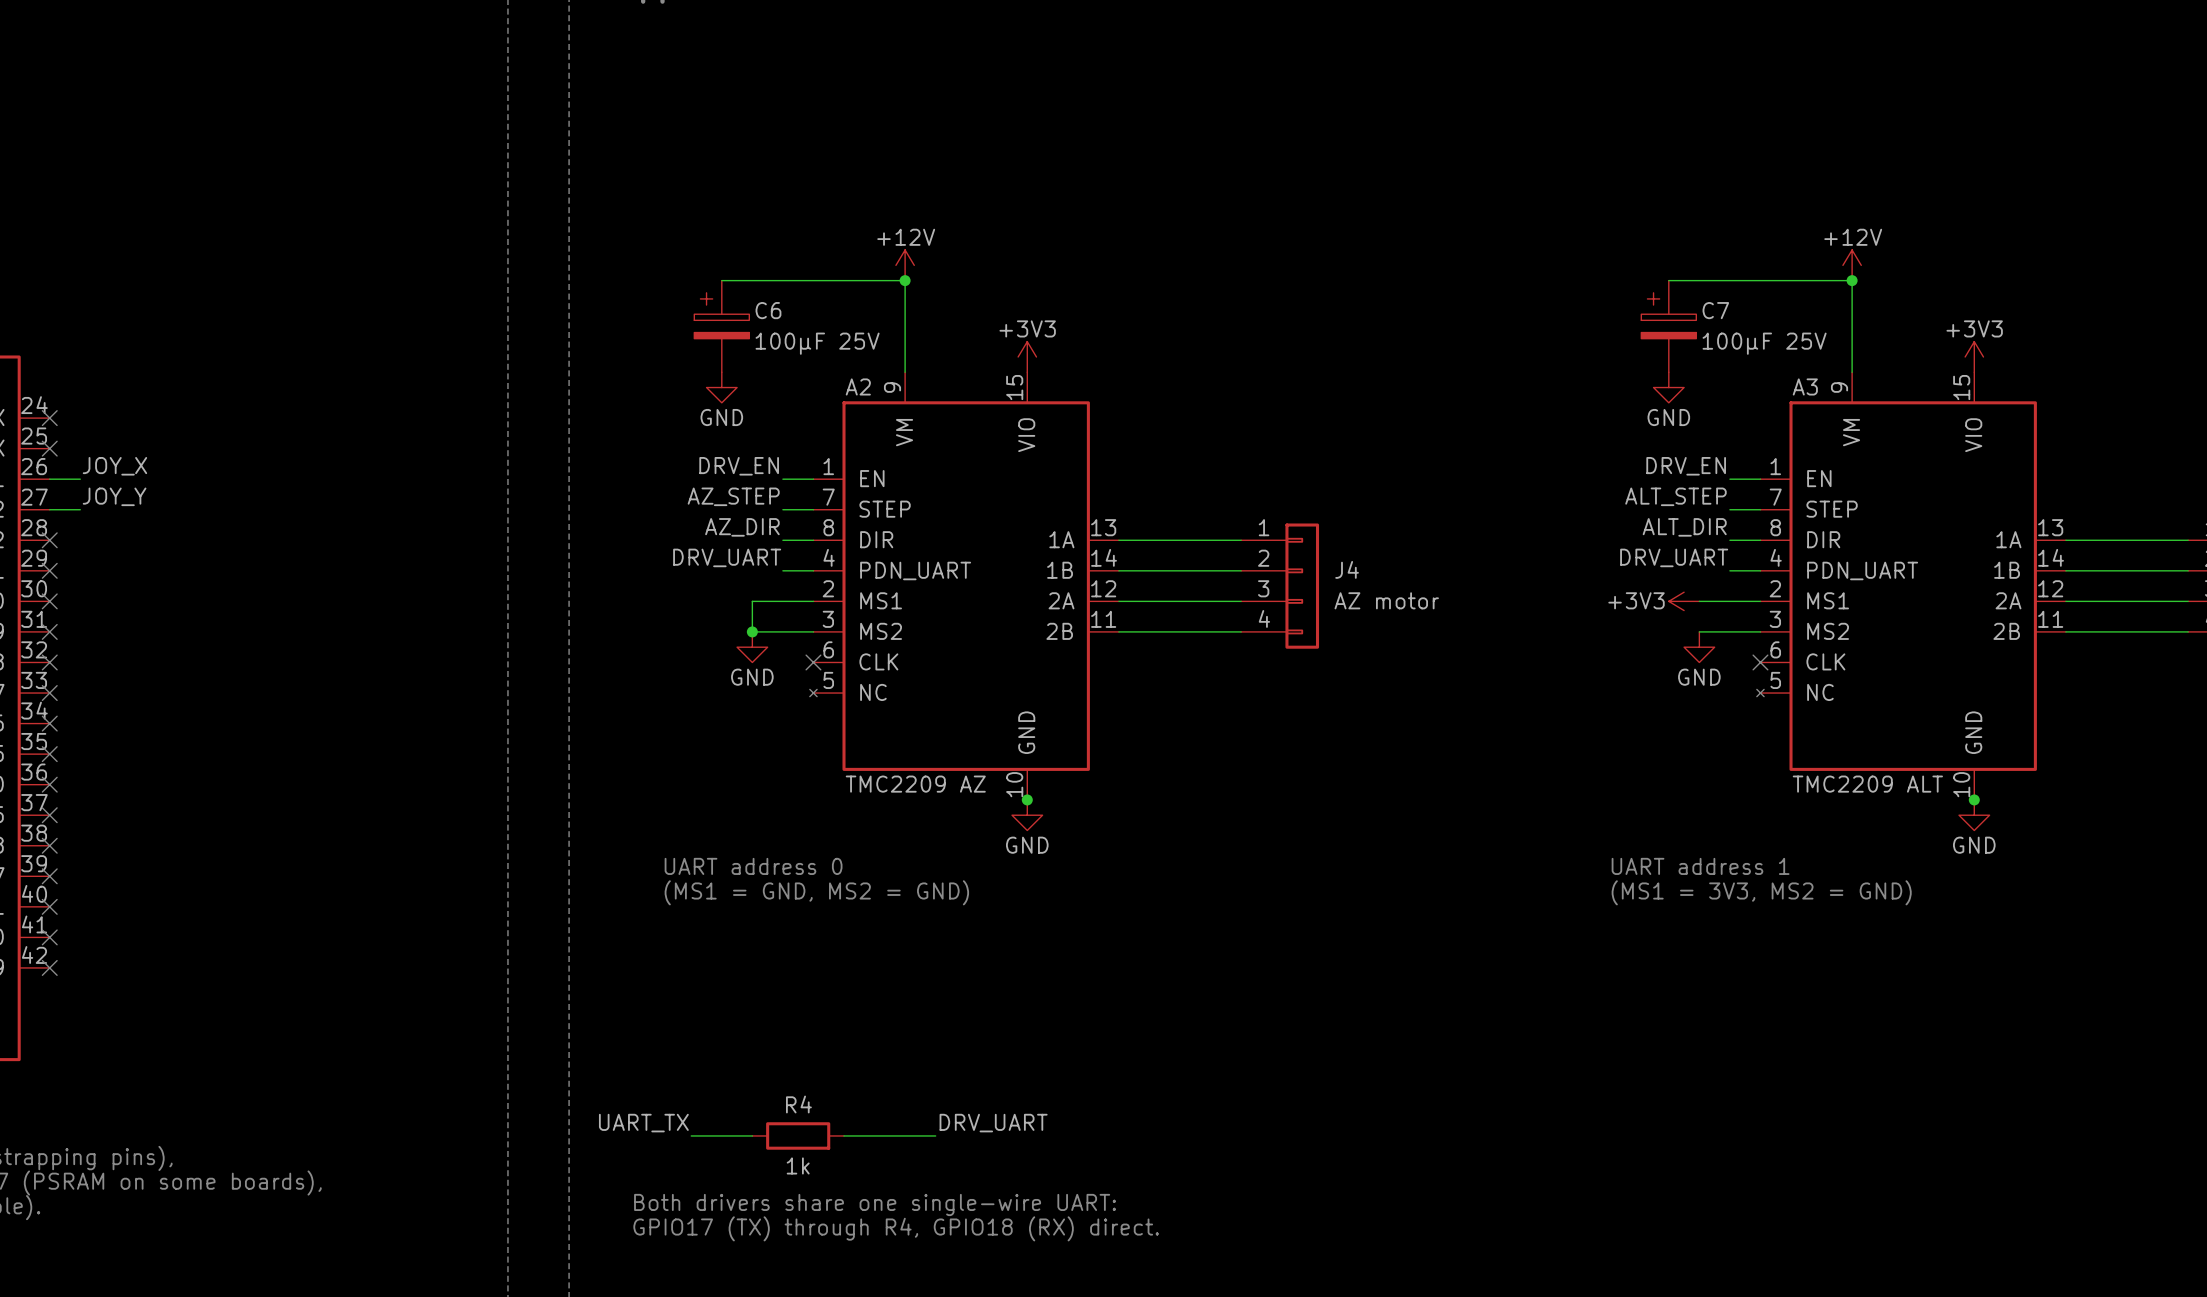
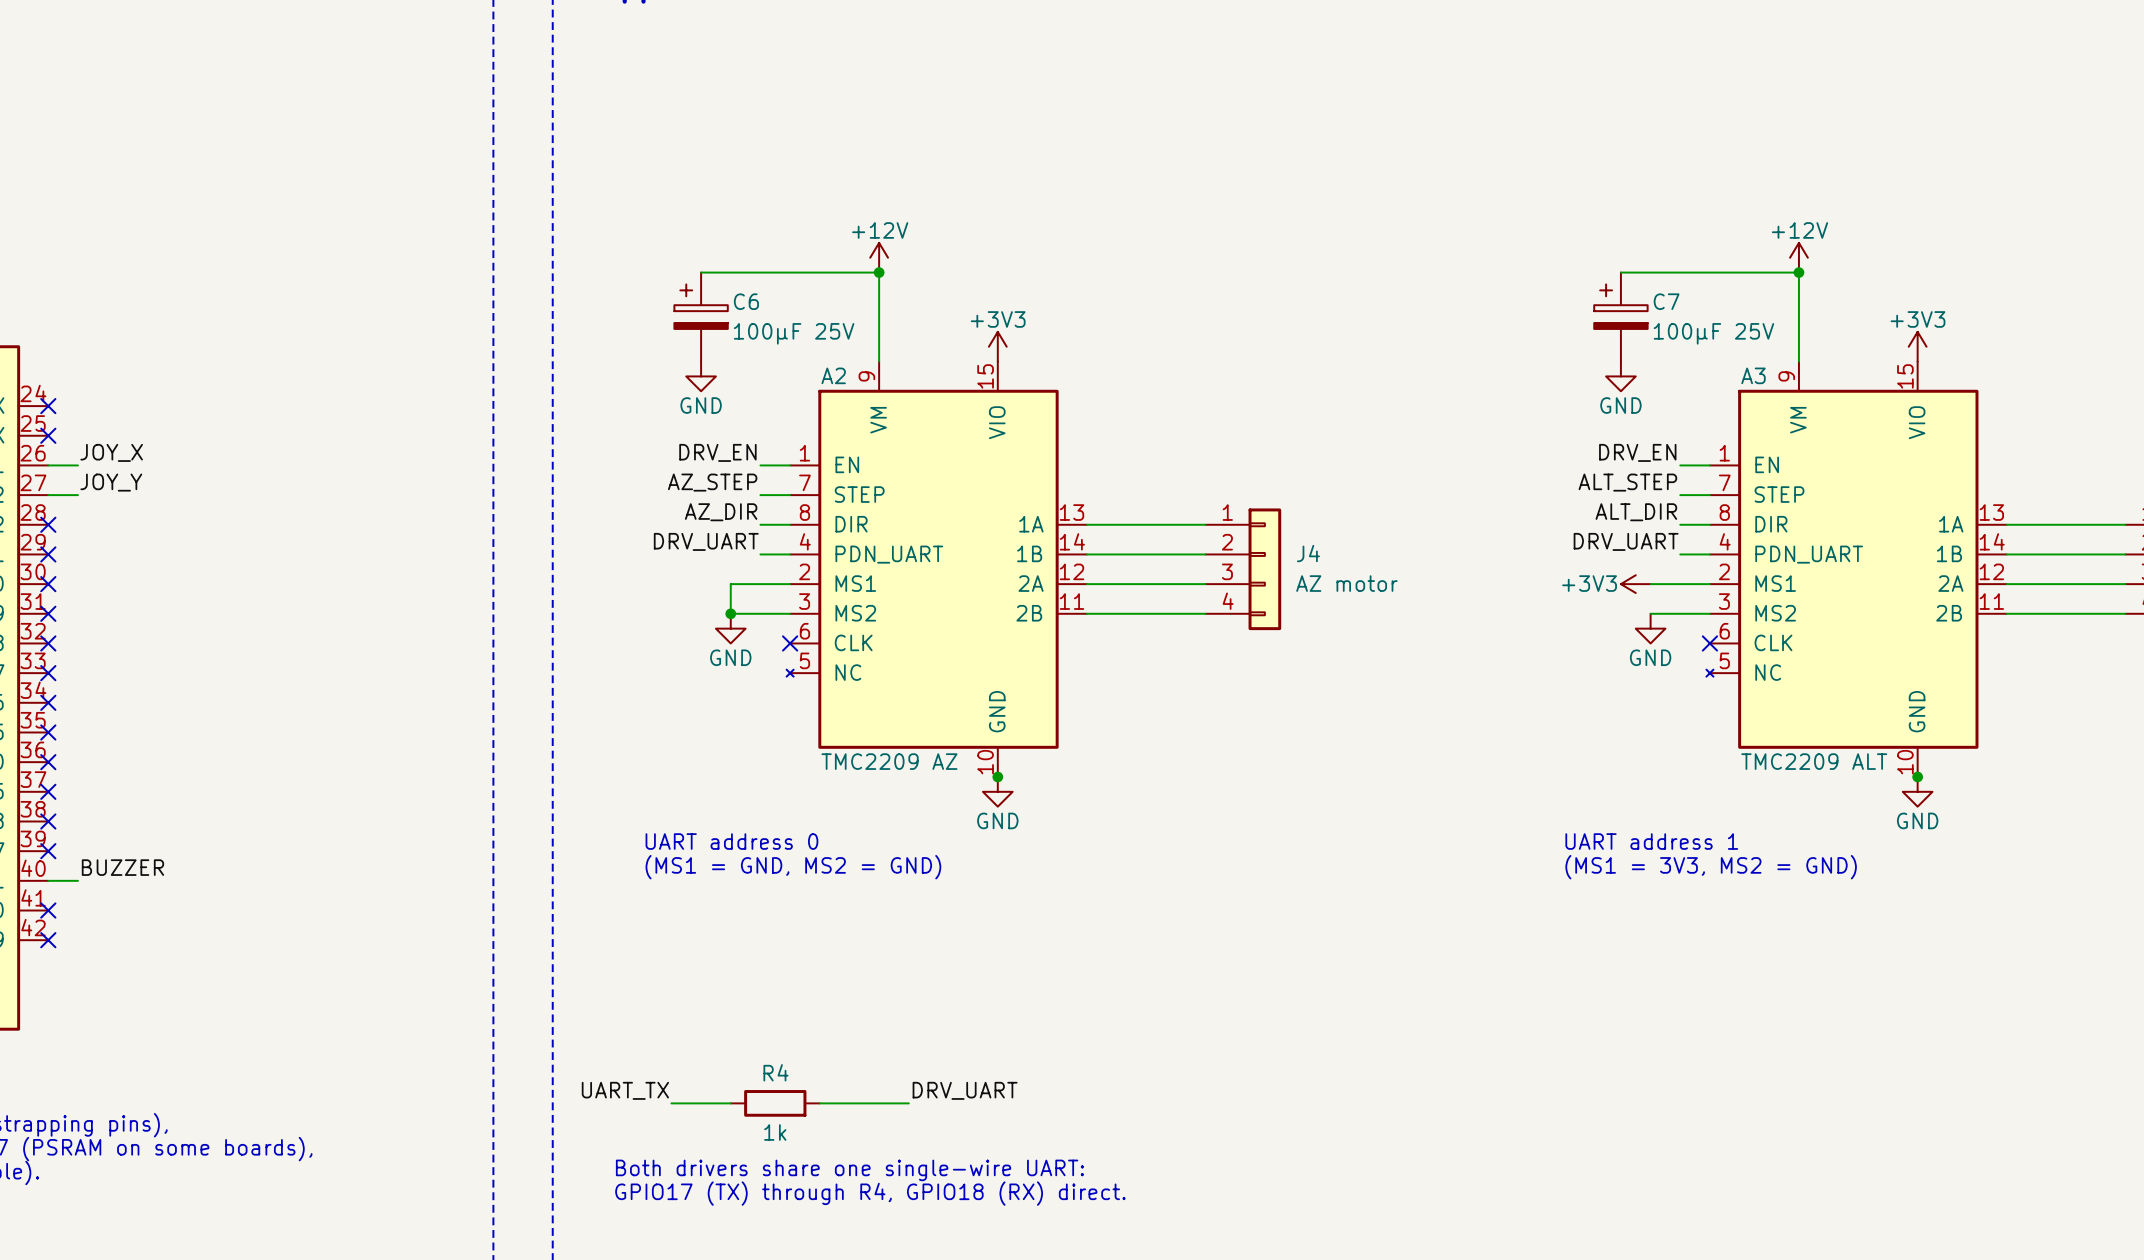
label: none -> BUZZER (122, 867)
wire: none -> (48, 880) (77, 880)
no-connect mark: (49, 906) -> none

